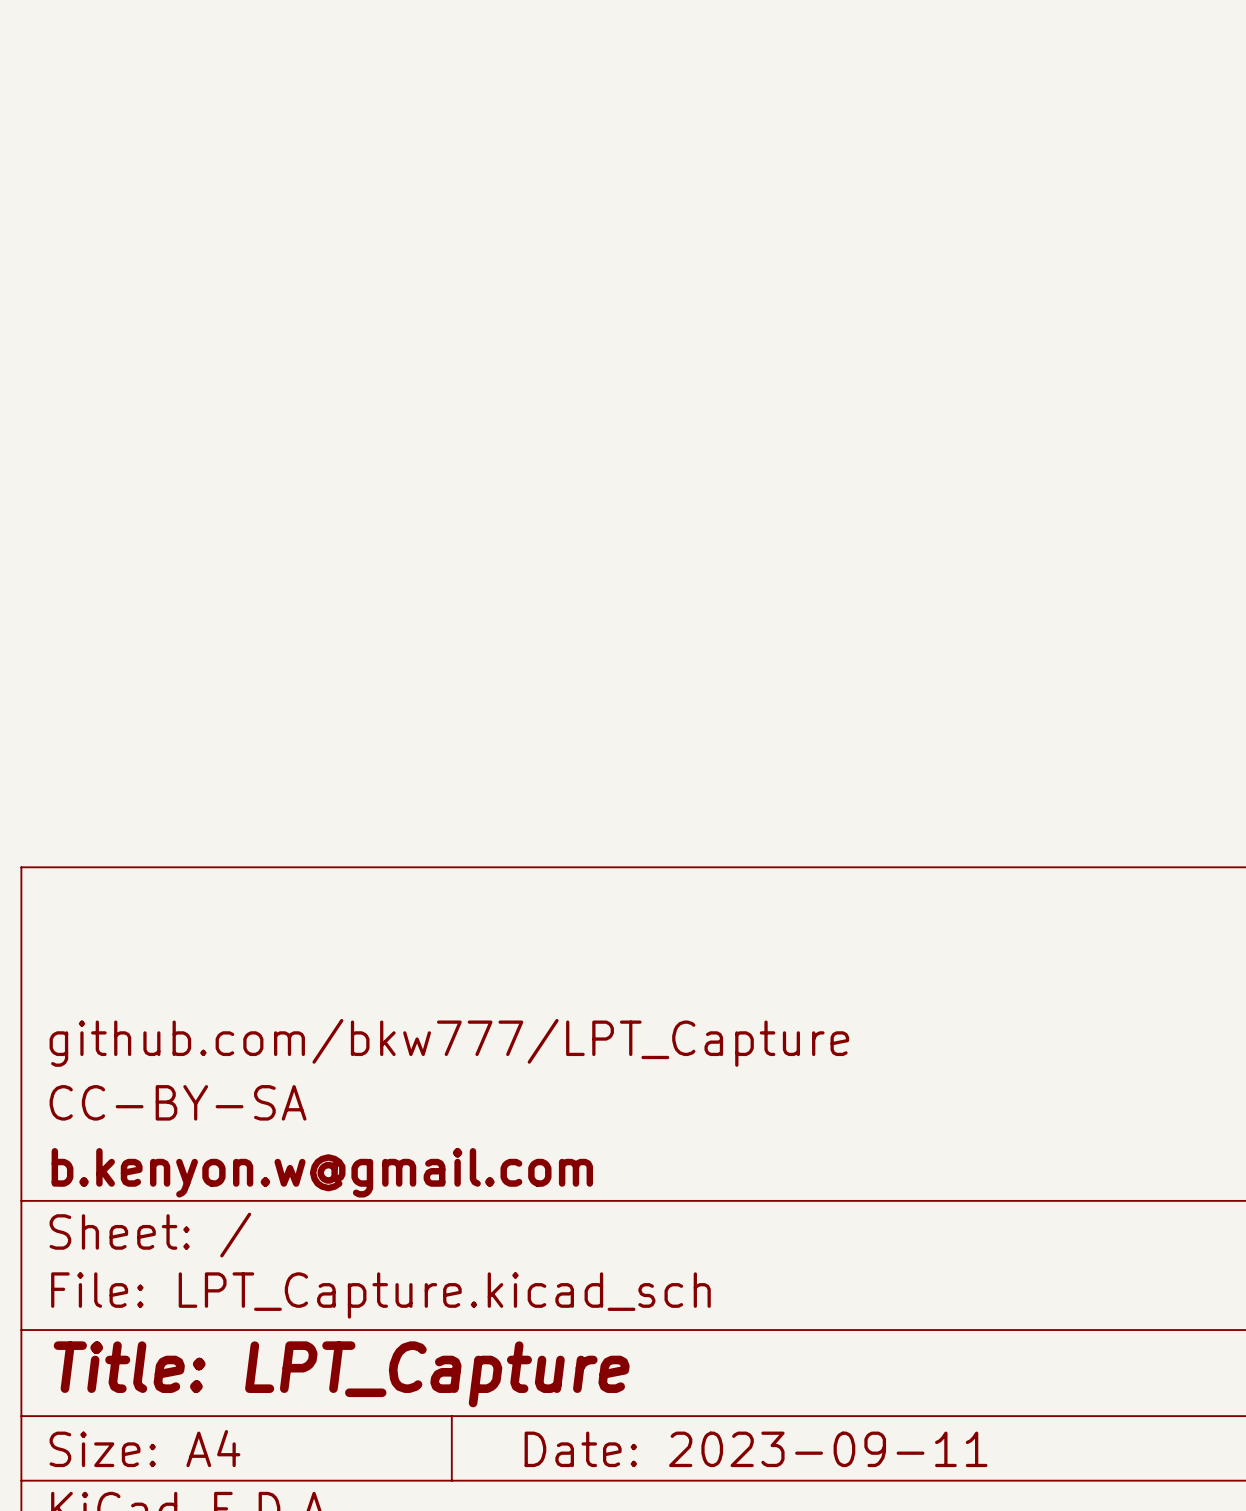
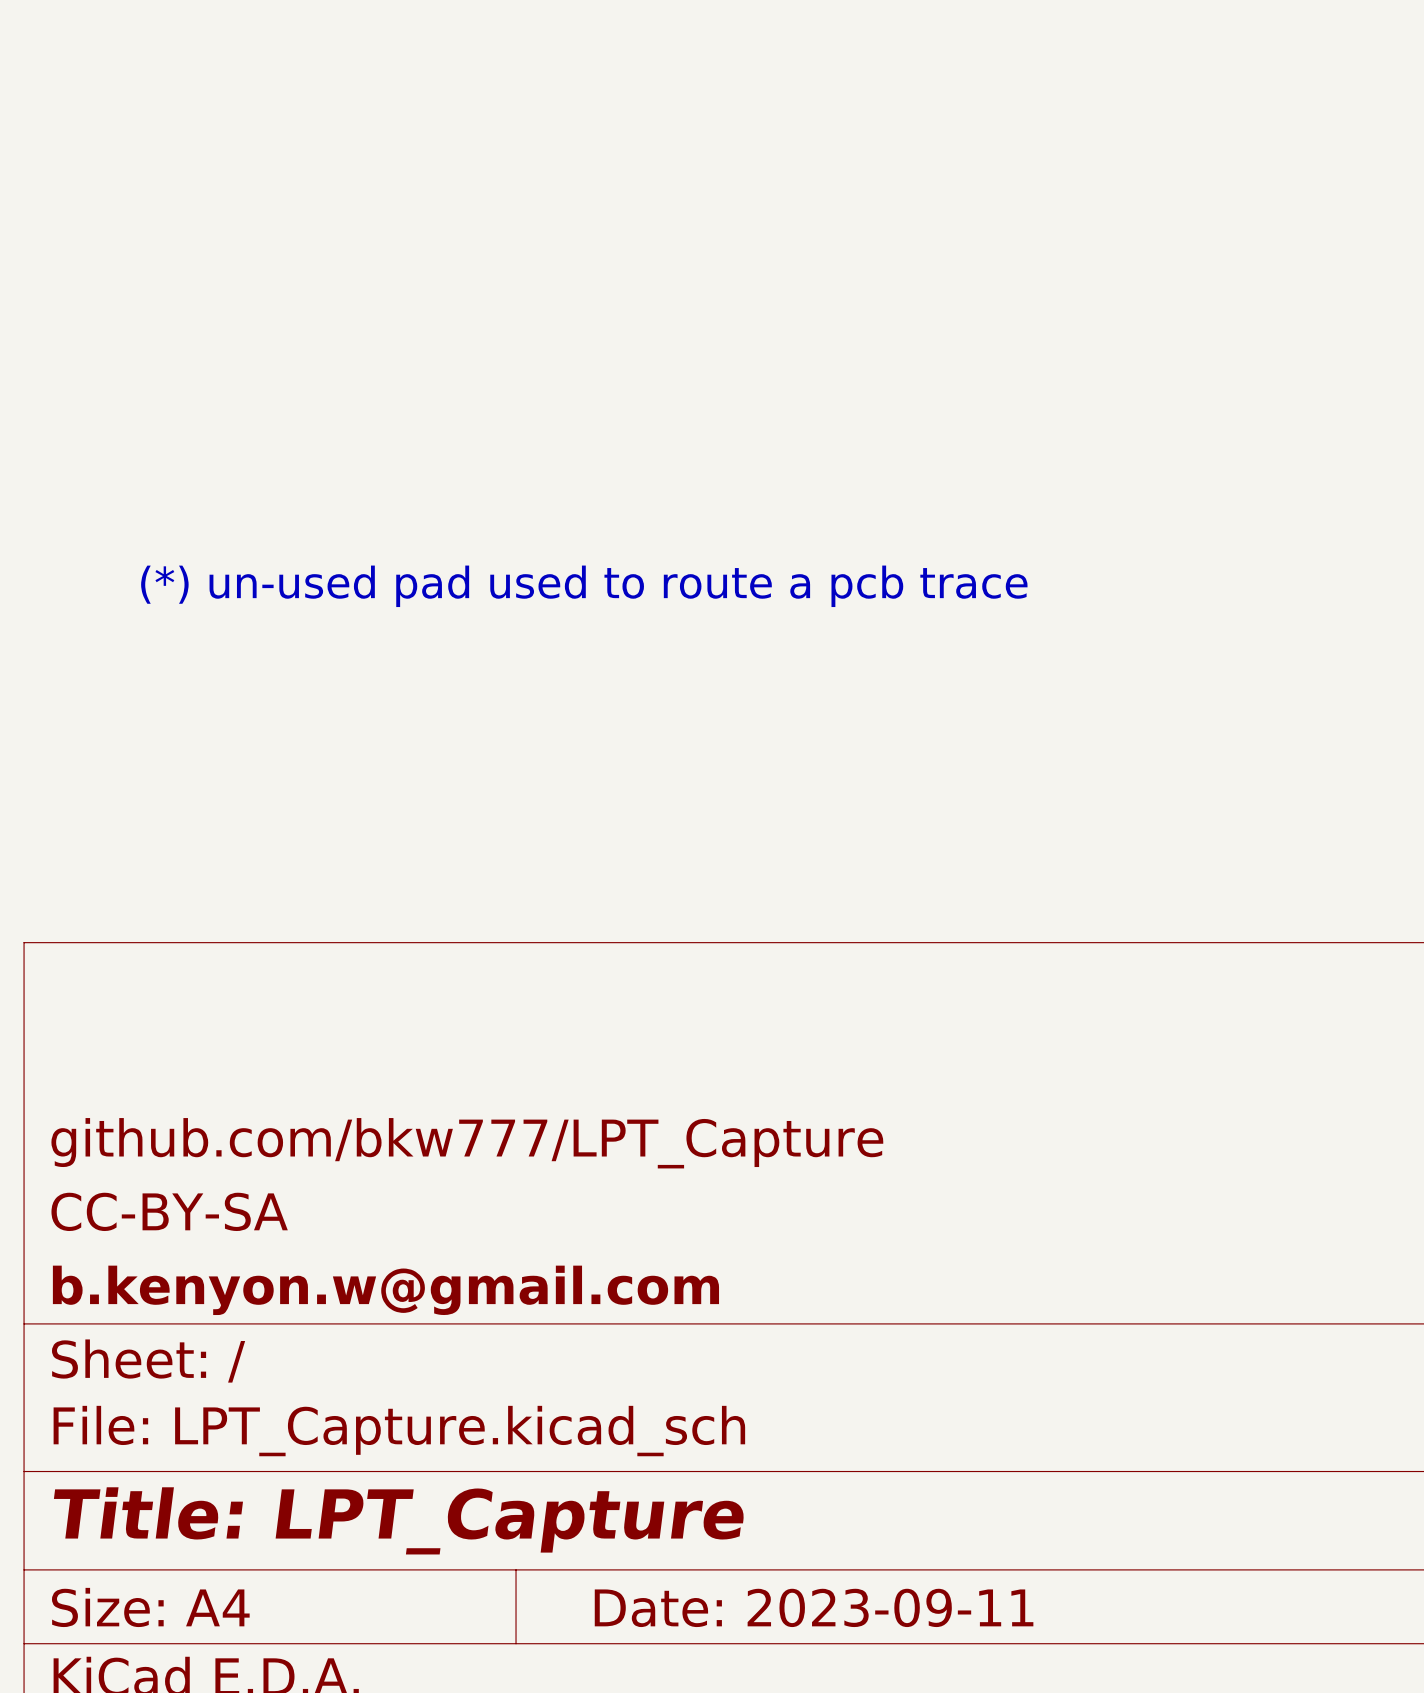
text: none -> (*) un-used pad used to route a pcb trace (584, 586)

